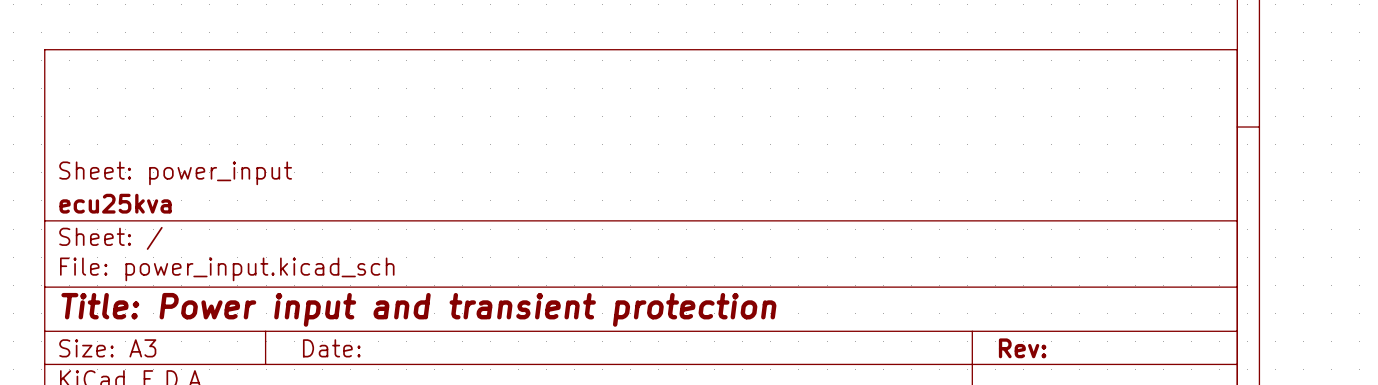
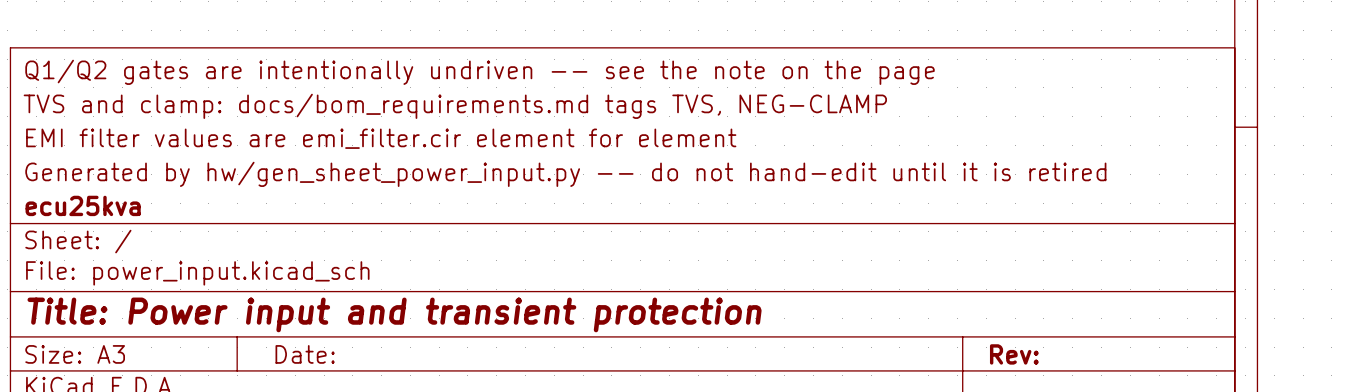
title block: none -> Q1/Q2 gates are intentionally undriven -- see the note on the page (480, 72)
title block: none -> TVS and clamp: docs/bom_requirements.md tags TVS, NEG-CLAMP (455, 106)
title block: none -> EMI filter values are emi_filter.cir element for element (381, 138)
title block: Sheet: power_input (175, 173) -> Generated by hw/gen_sheet_power_input.py -- do not hand-edit until it is retired (565, 174)

